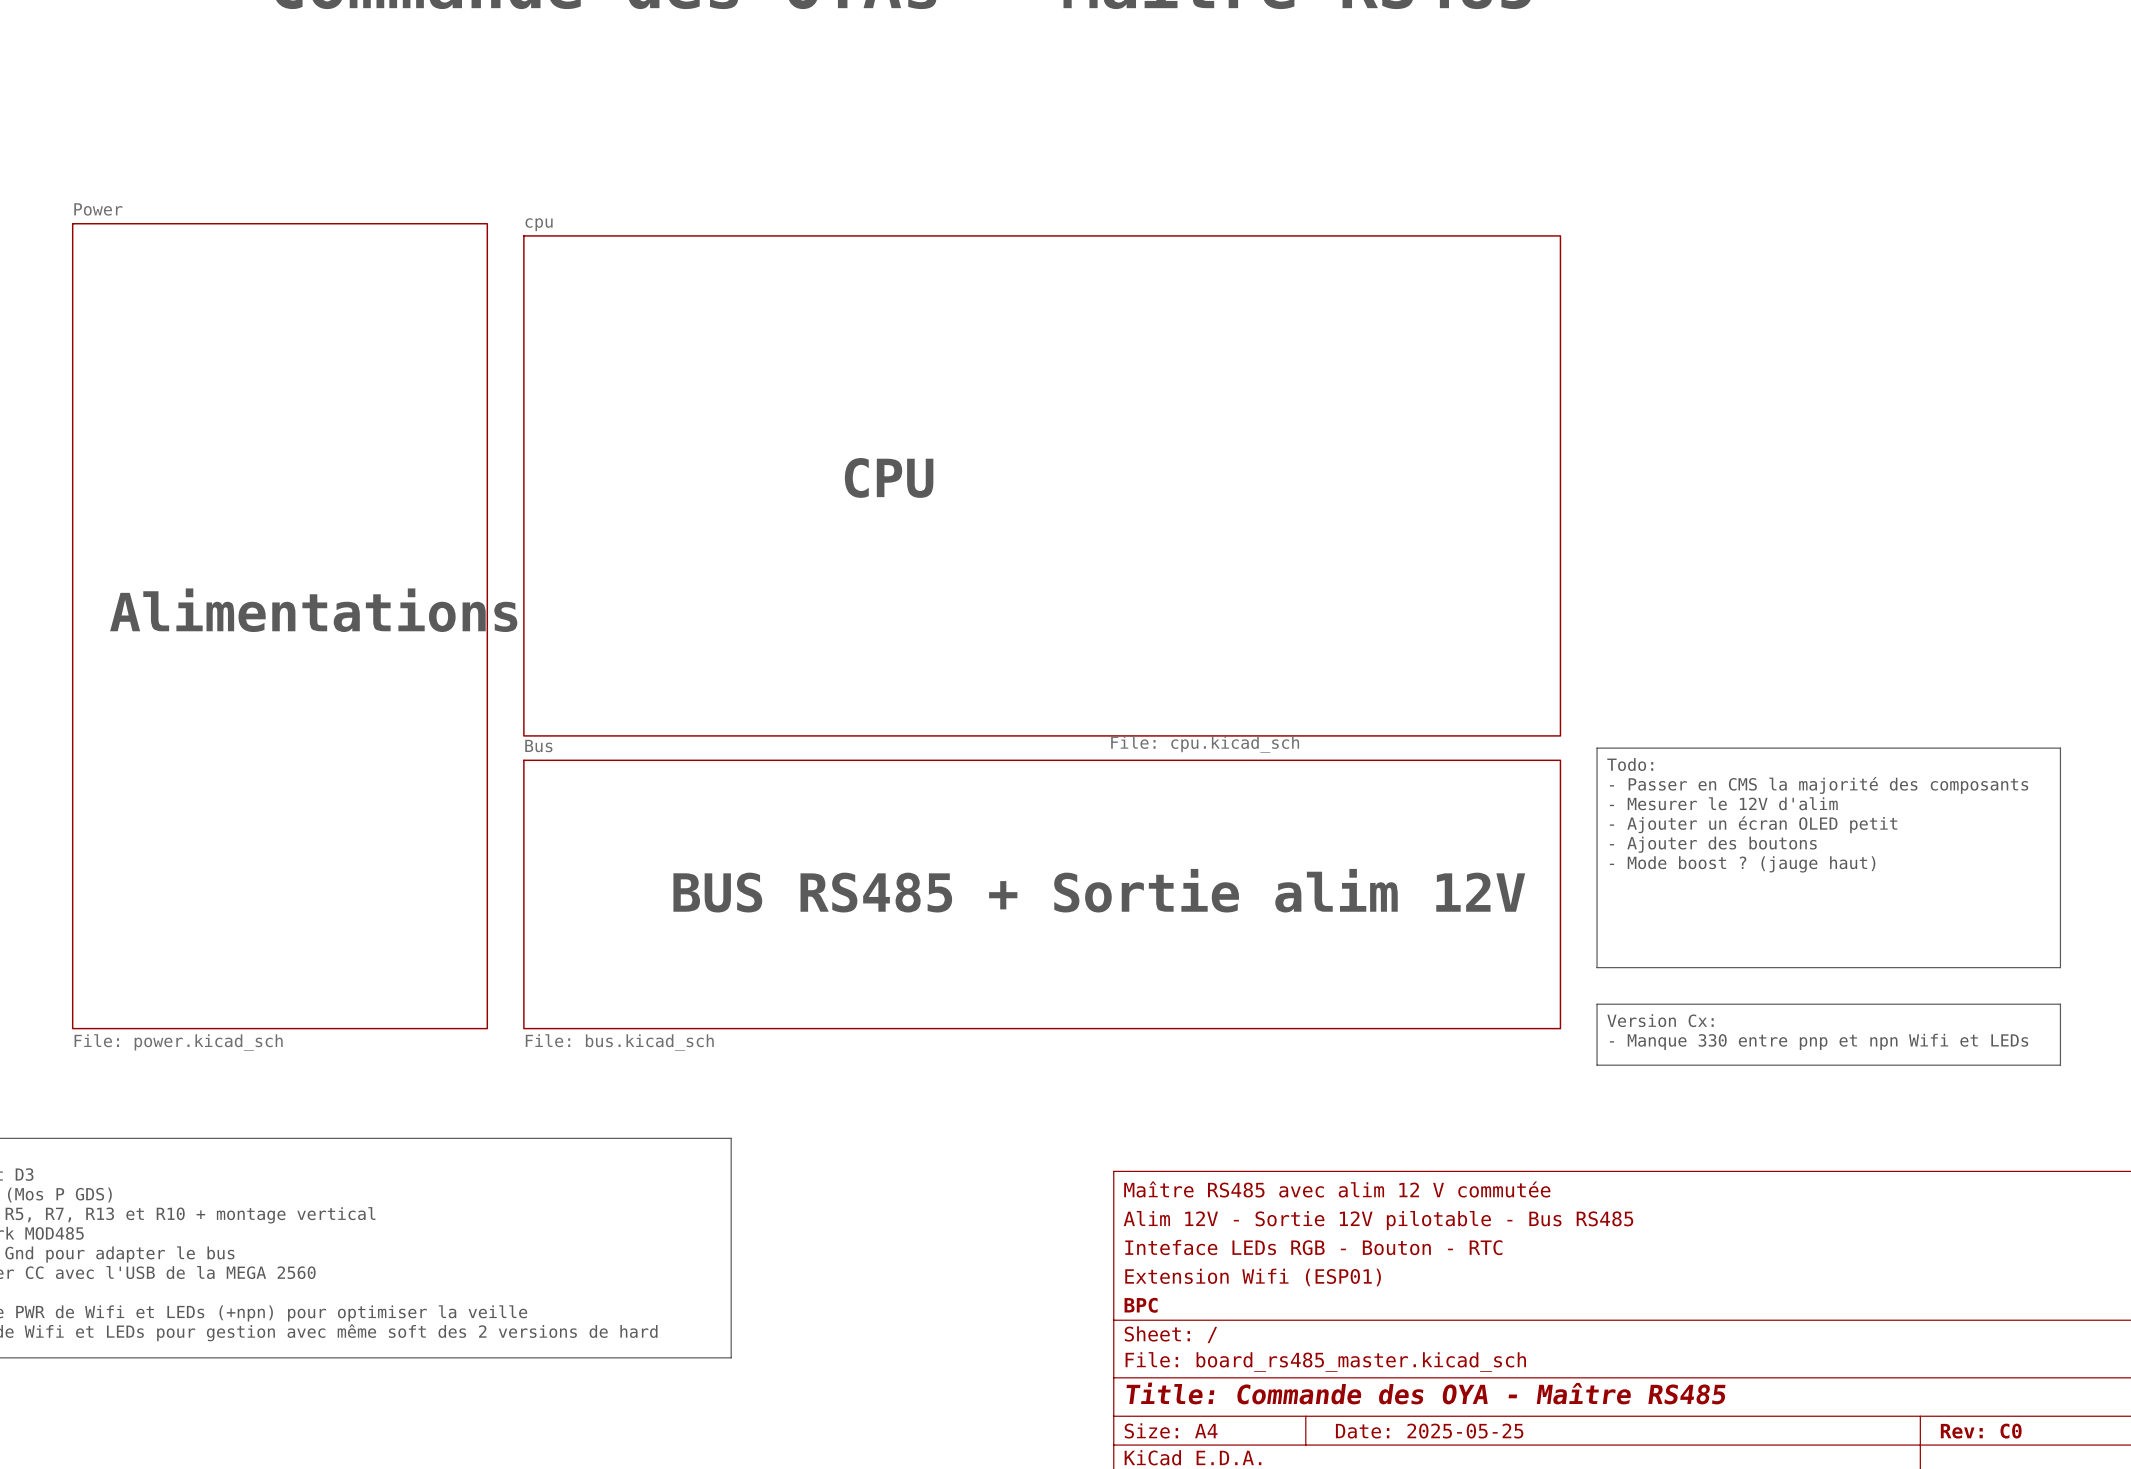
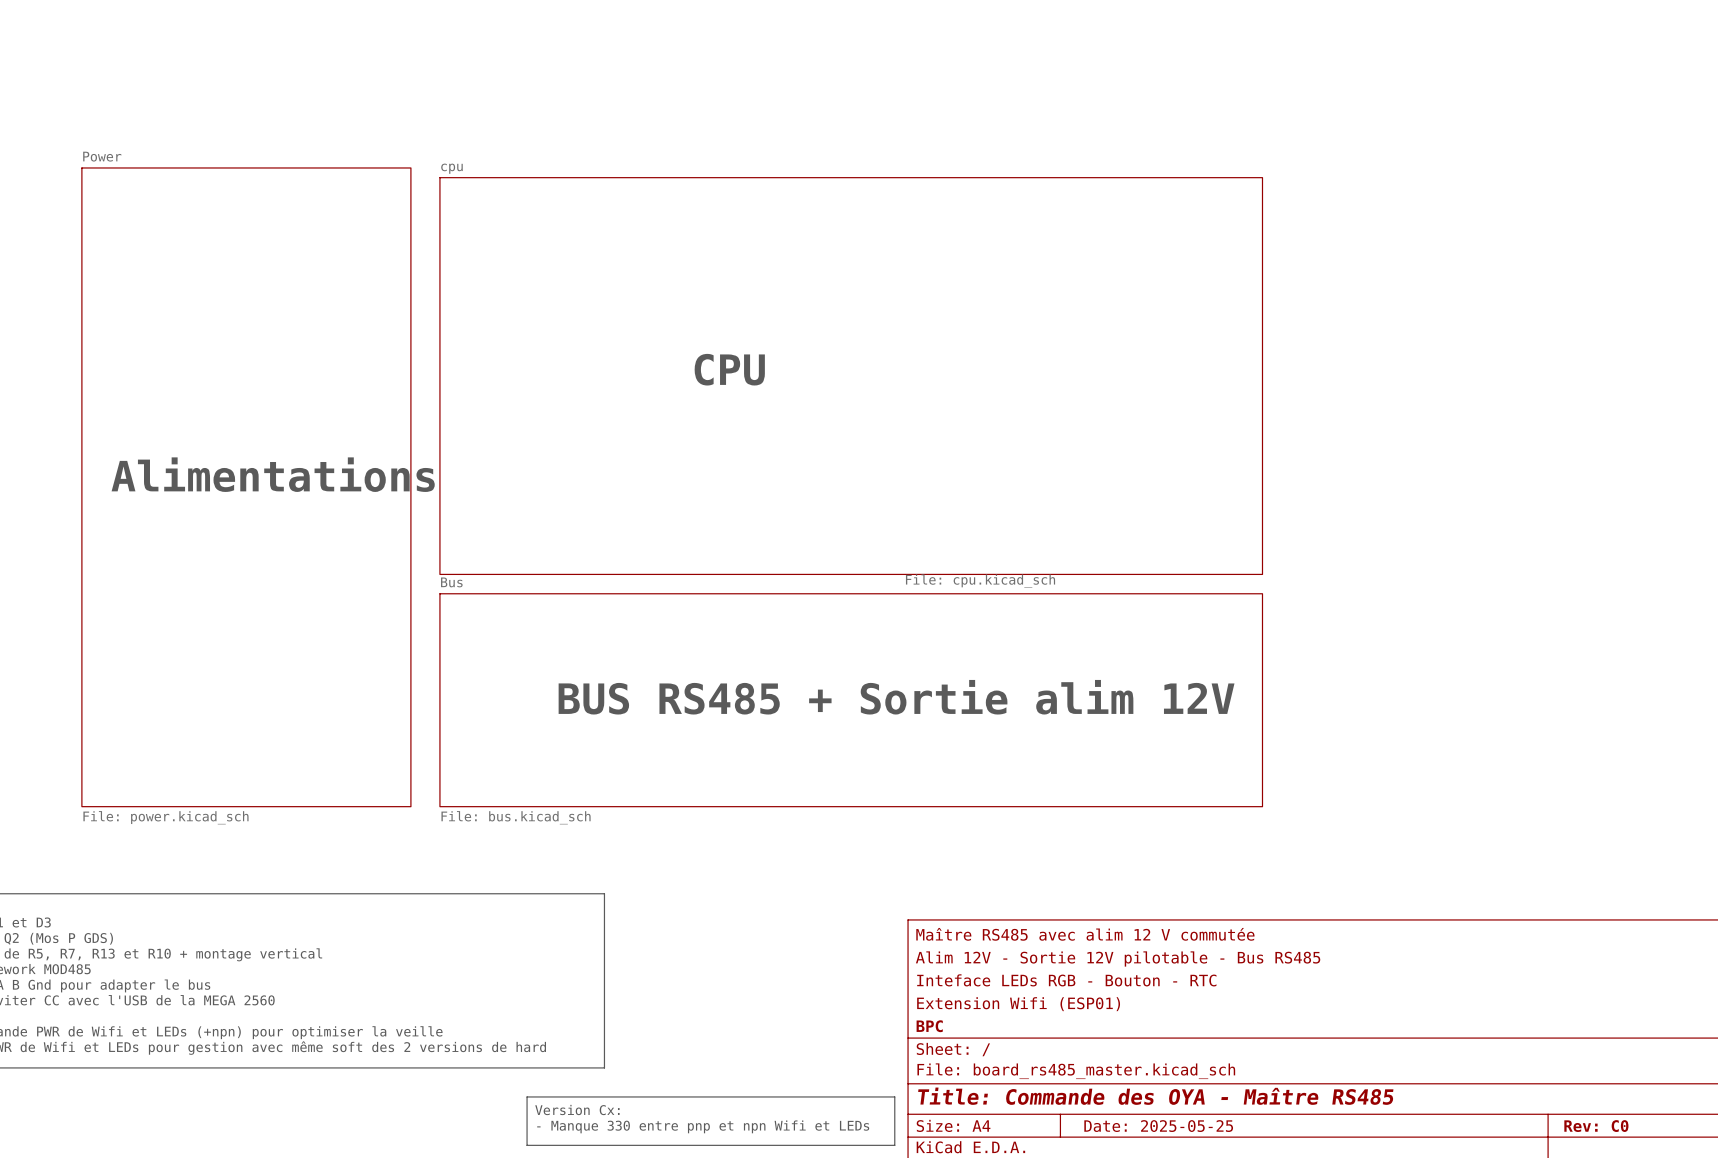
line: (1597, 748) (1597, 967) (2060, 967) (2060, 748) (1597, 748) -> none
text: Todo: (1630, 764) -> none
text: - Passer en CMS la majorité des composants (1819, 785) -> none
text: - Mesurer le 12V d'alim (1723, 803) -> none
text: - Ajouter un écran OLED petit (1753, 824) -> none
text: - Ajouter des boutons (1713, 844) -> none
text: - Mode boost ? (jauge haut) (1742, 864) -> none
line: (1597, 1004) (2060, 1004) (2060, 1065) (1597, 1065) (1597, 1004) -> none
text: Version Cx: (1660, 1020) -> none
text: - Manque 330 entre pnp et npn Wifi et LEDs (1819, 1041) -> none
line: none -> (527, 1096) (894, 1096) (894, 1145) (527, 1145) (527, 1096)
text: none -> Version Cx: (577, 1110)
text: none -> - Manque 330 entre pnp et npn Wifi et LEDs (703, 1126)

